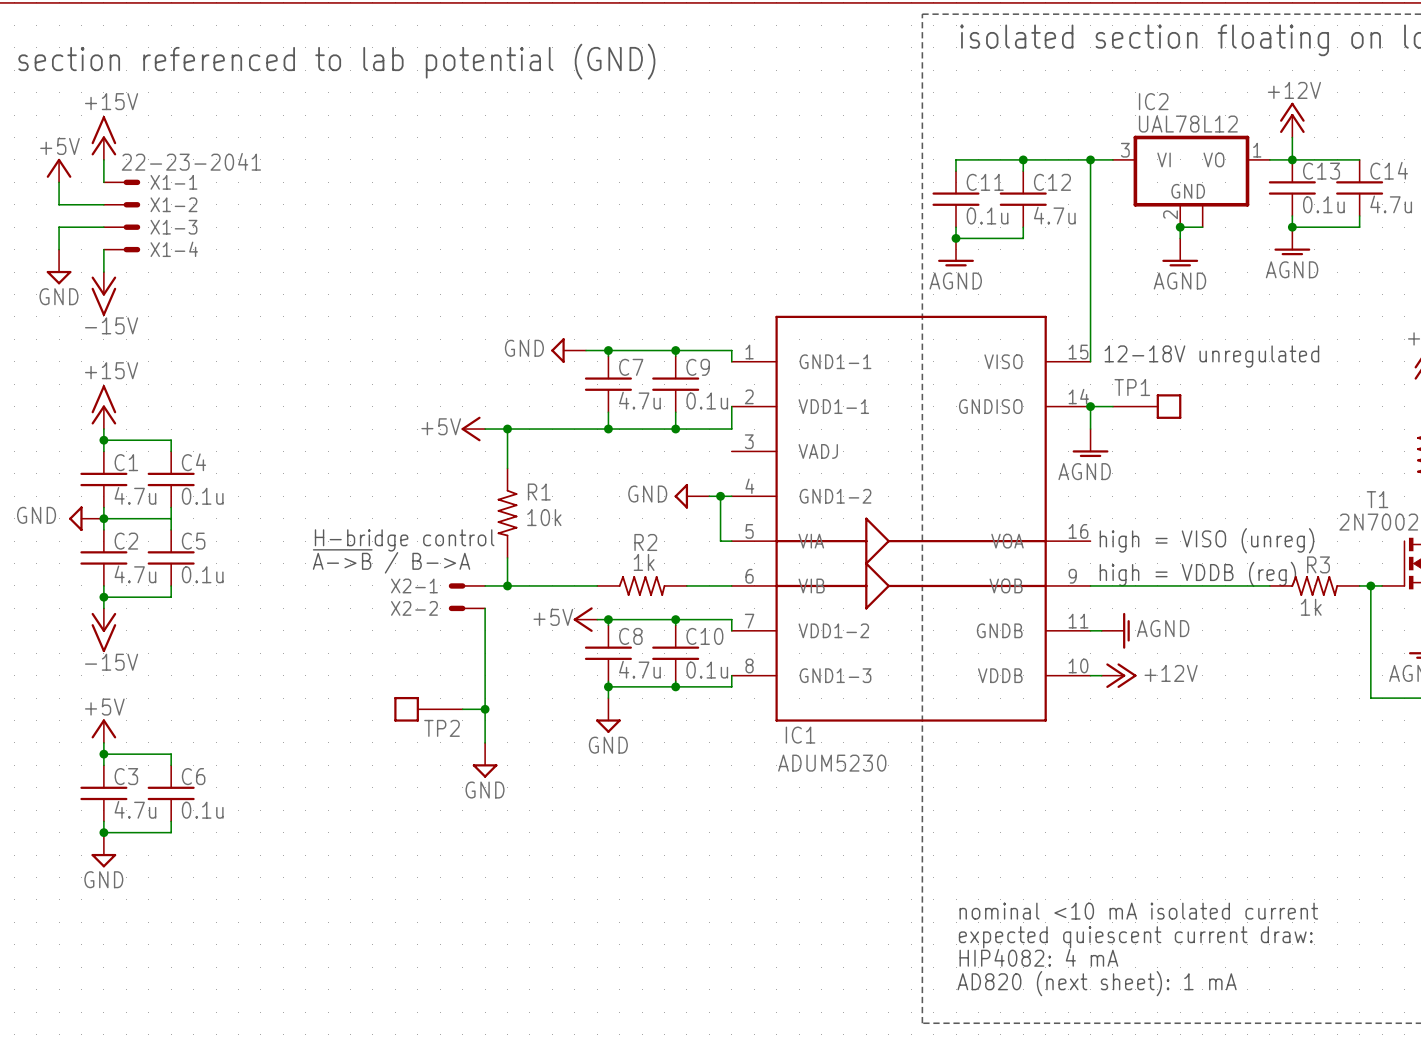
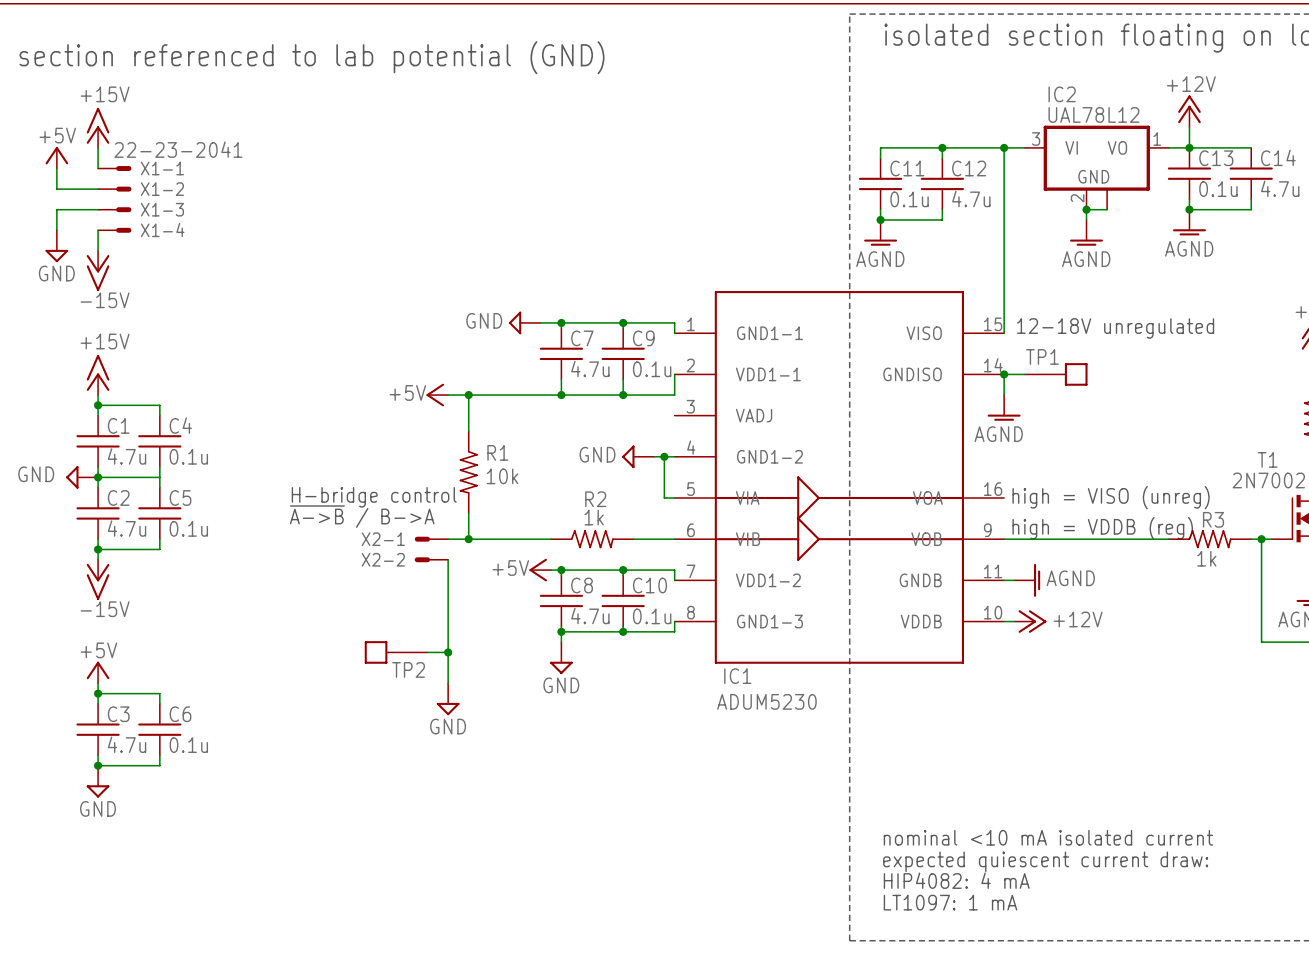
text: AD820 (next sheet): 1 mA (1097, 983) -> LT1097: 1 mA (950, 902)

